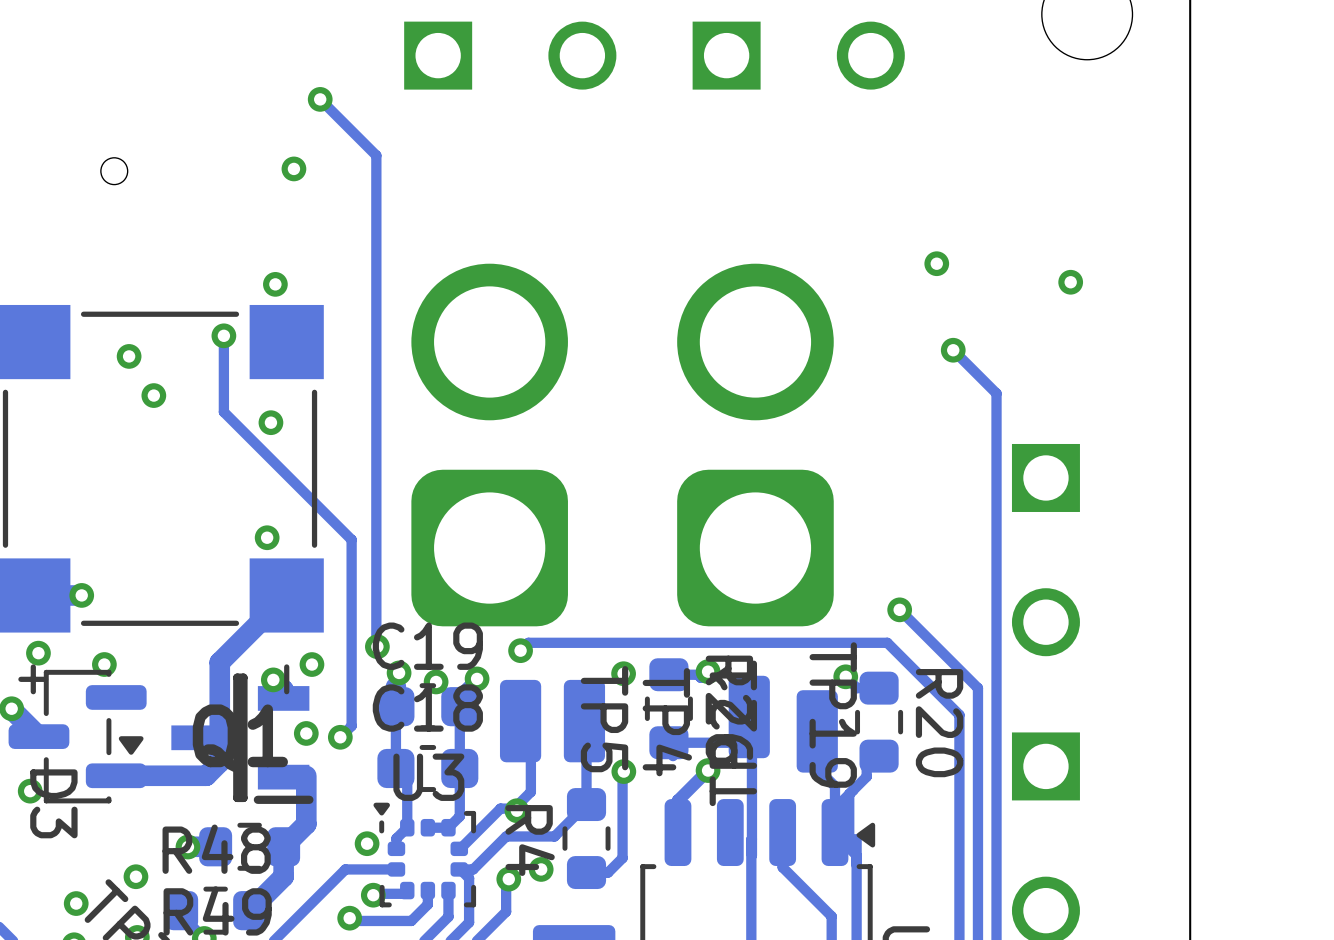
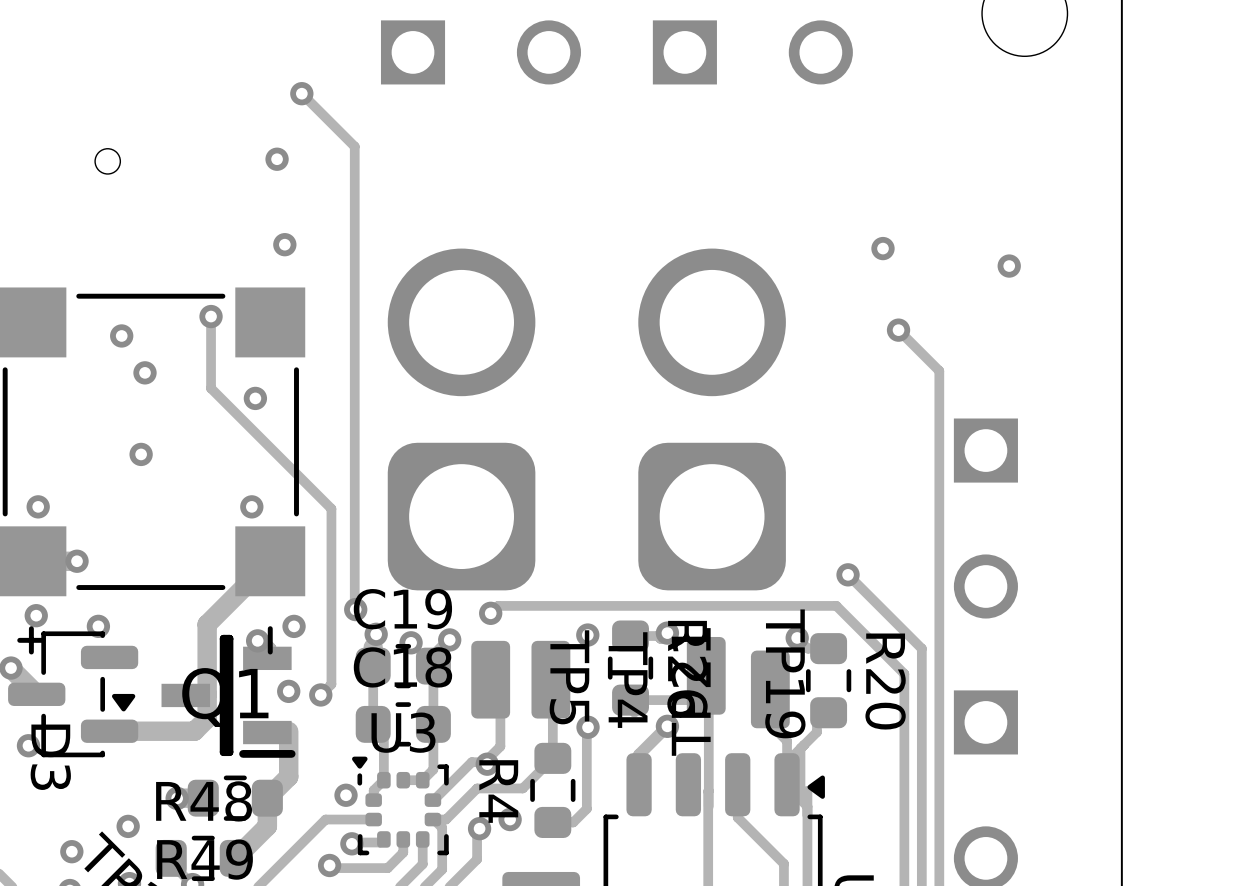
via position: (275, 284) -> (284, 244)
via: none -> (141, 454)
via: none -> (38, 506)

